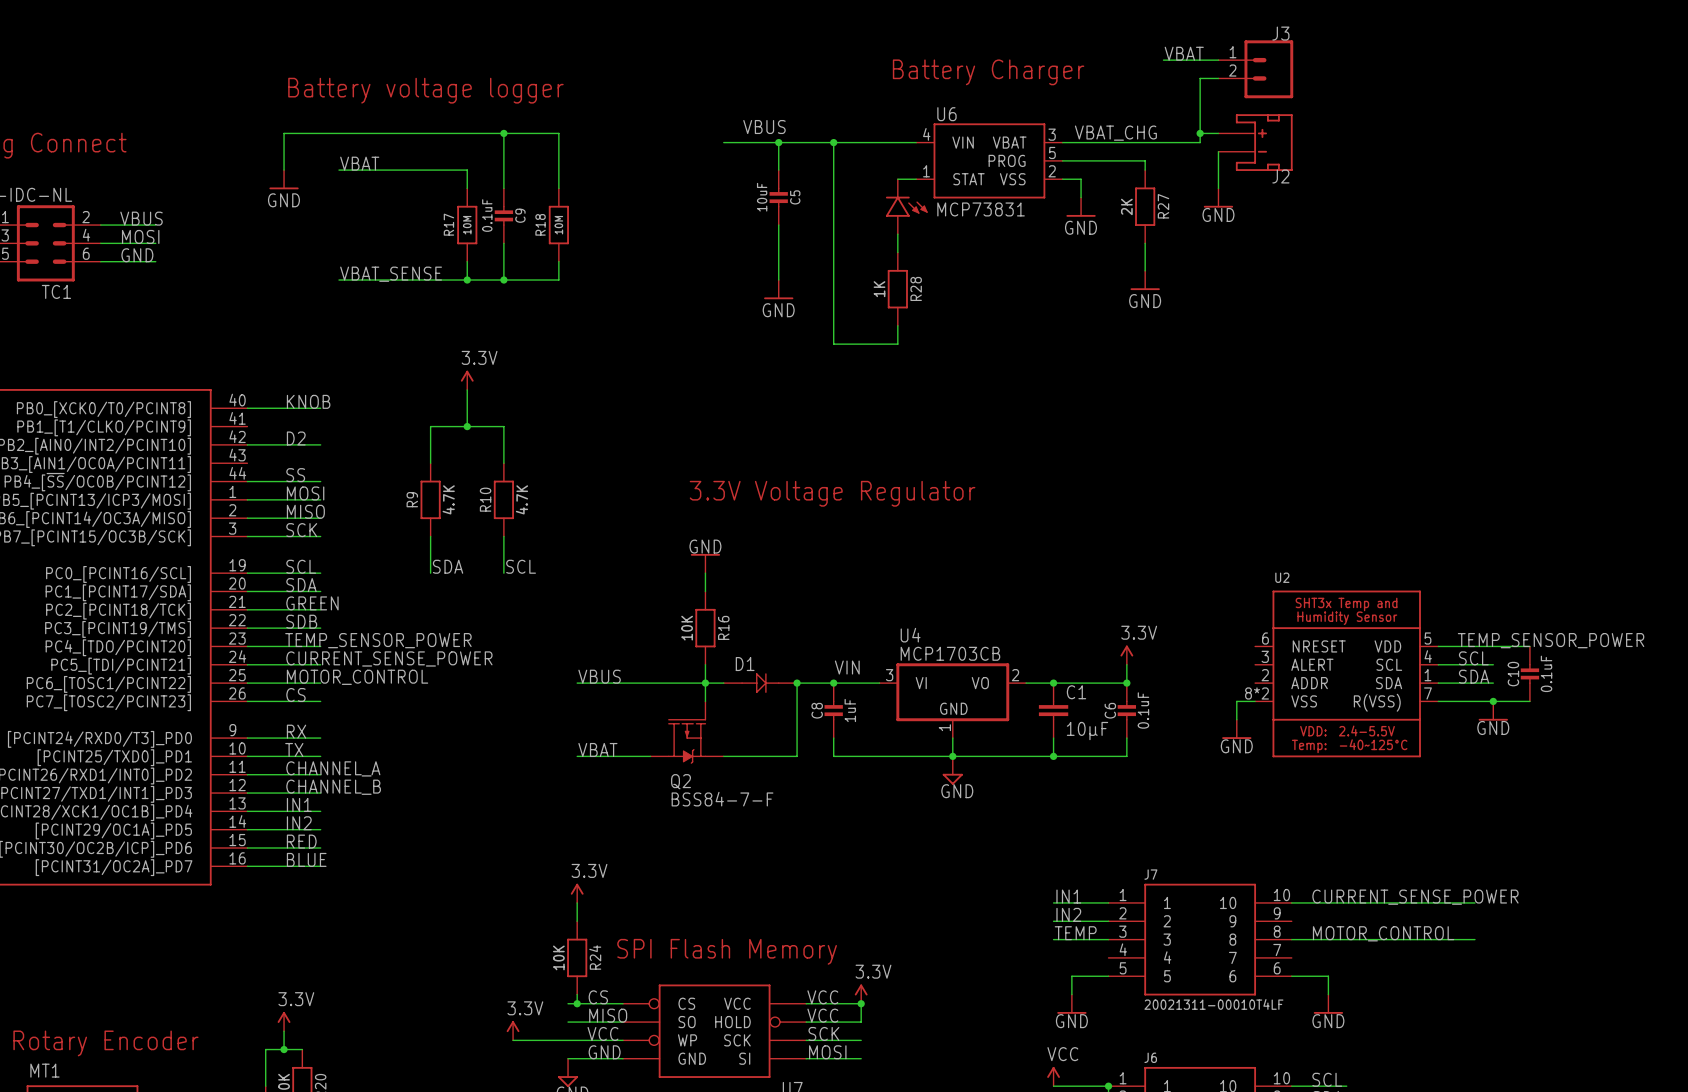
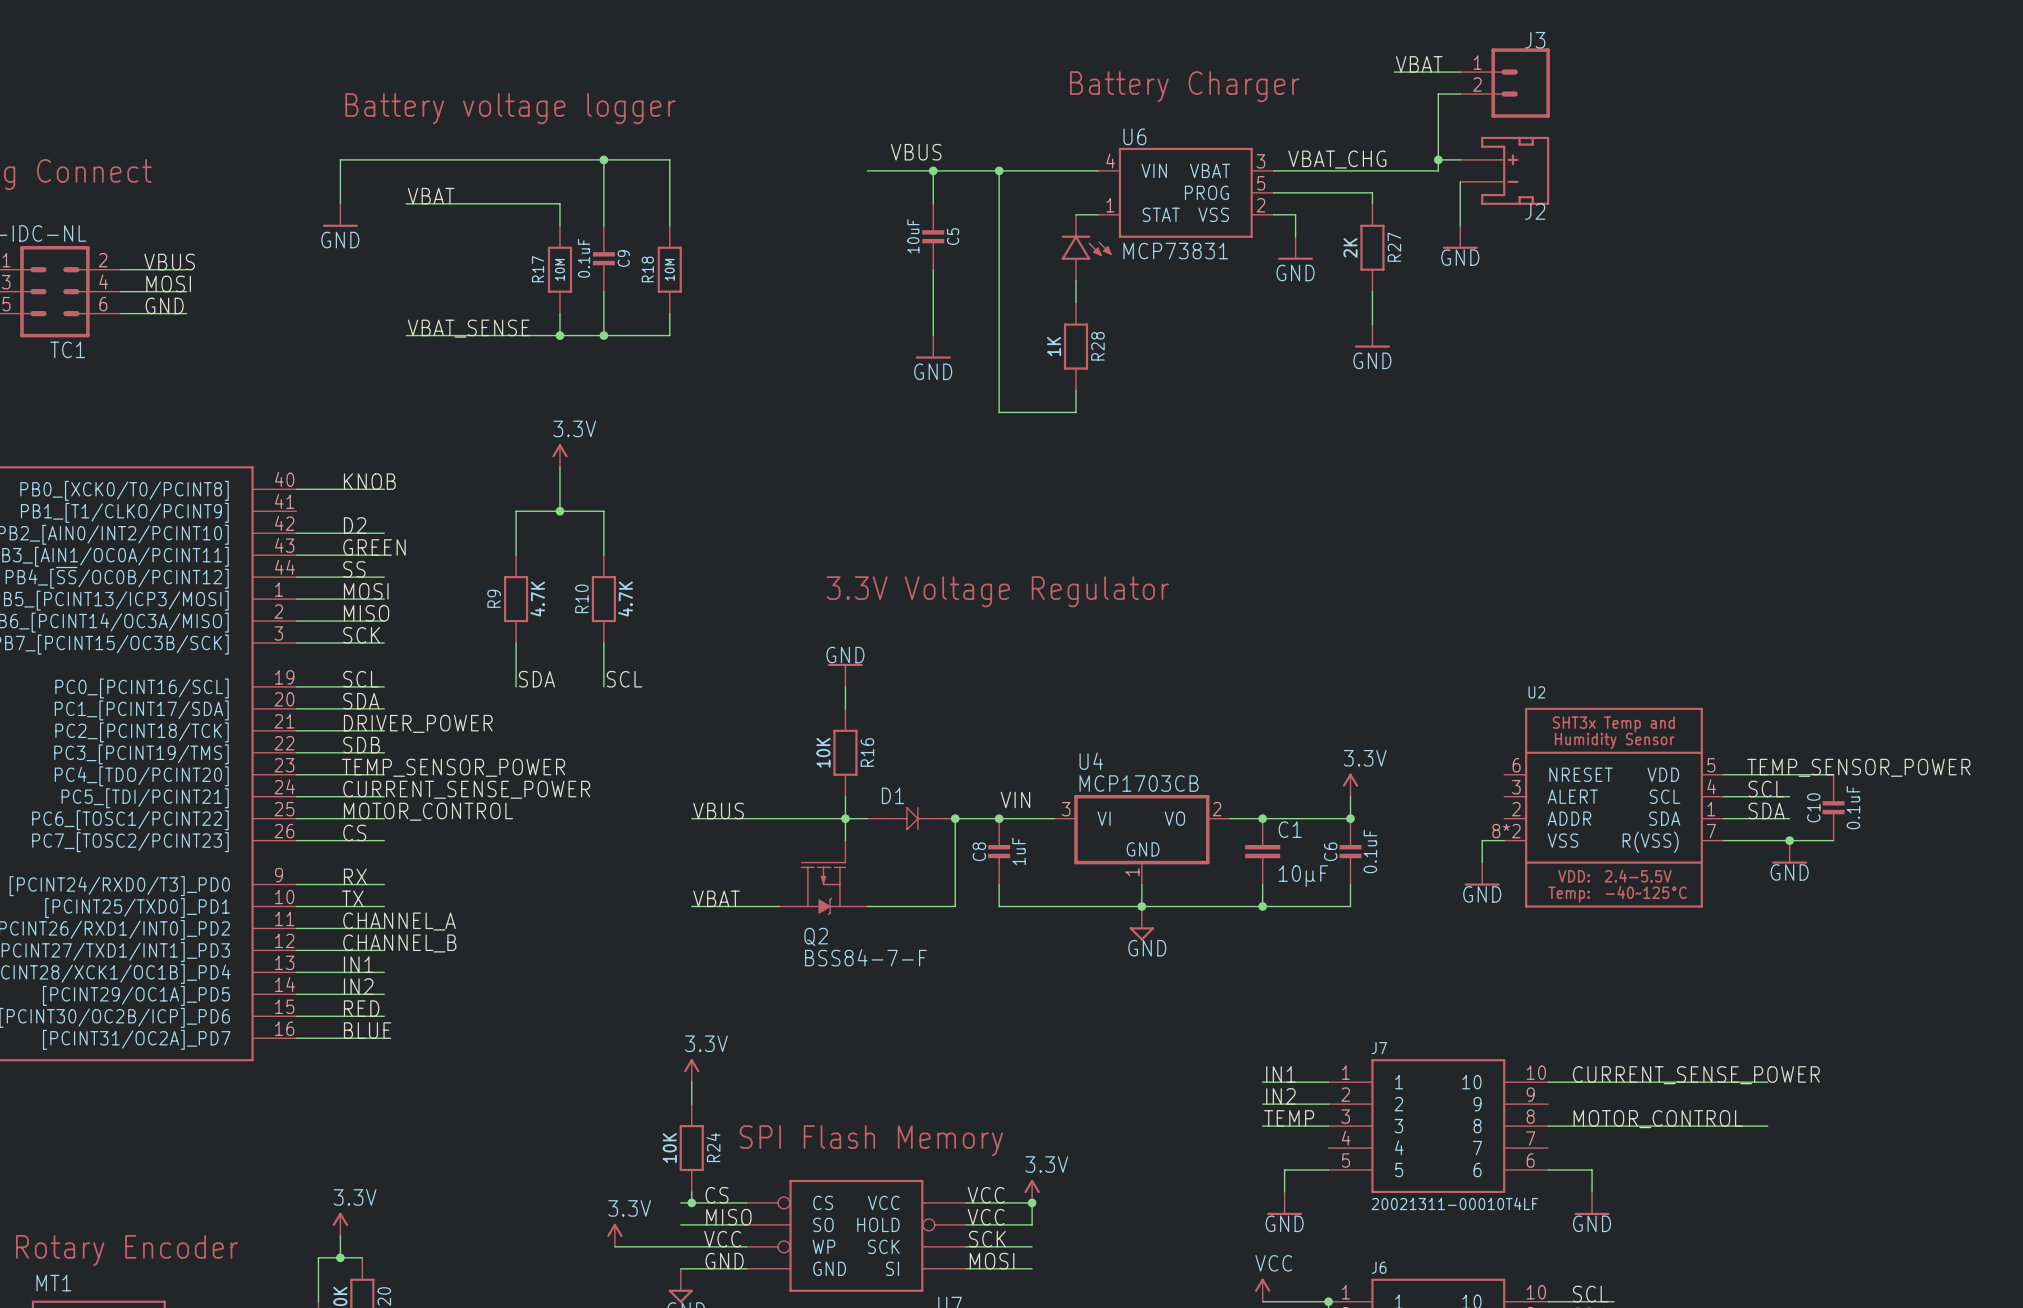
label: none -> GREEN (374, 547)
wire: none -> (296, 555) (384, 555)
label: GREEN (312, 603) -> DRIVER_POWER (418, 723)

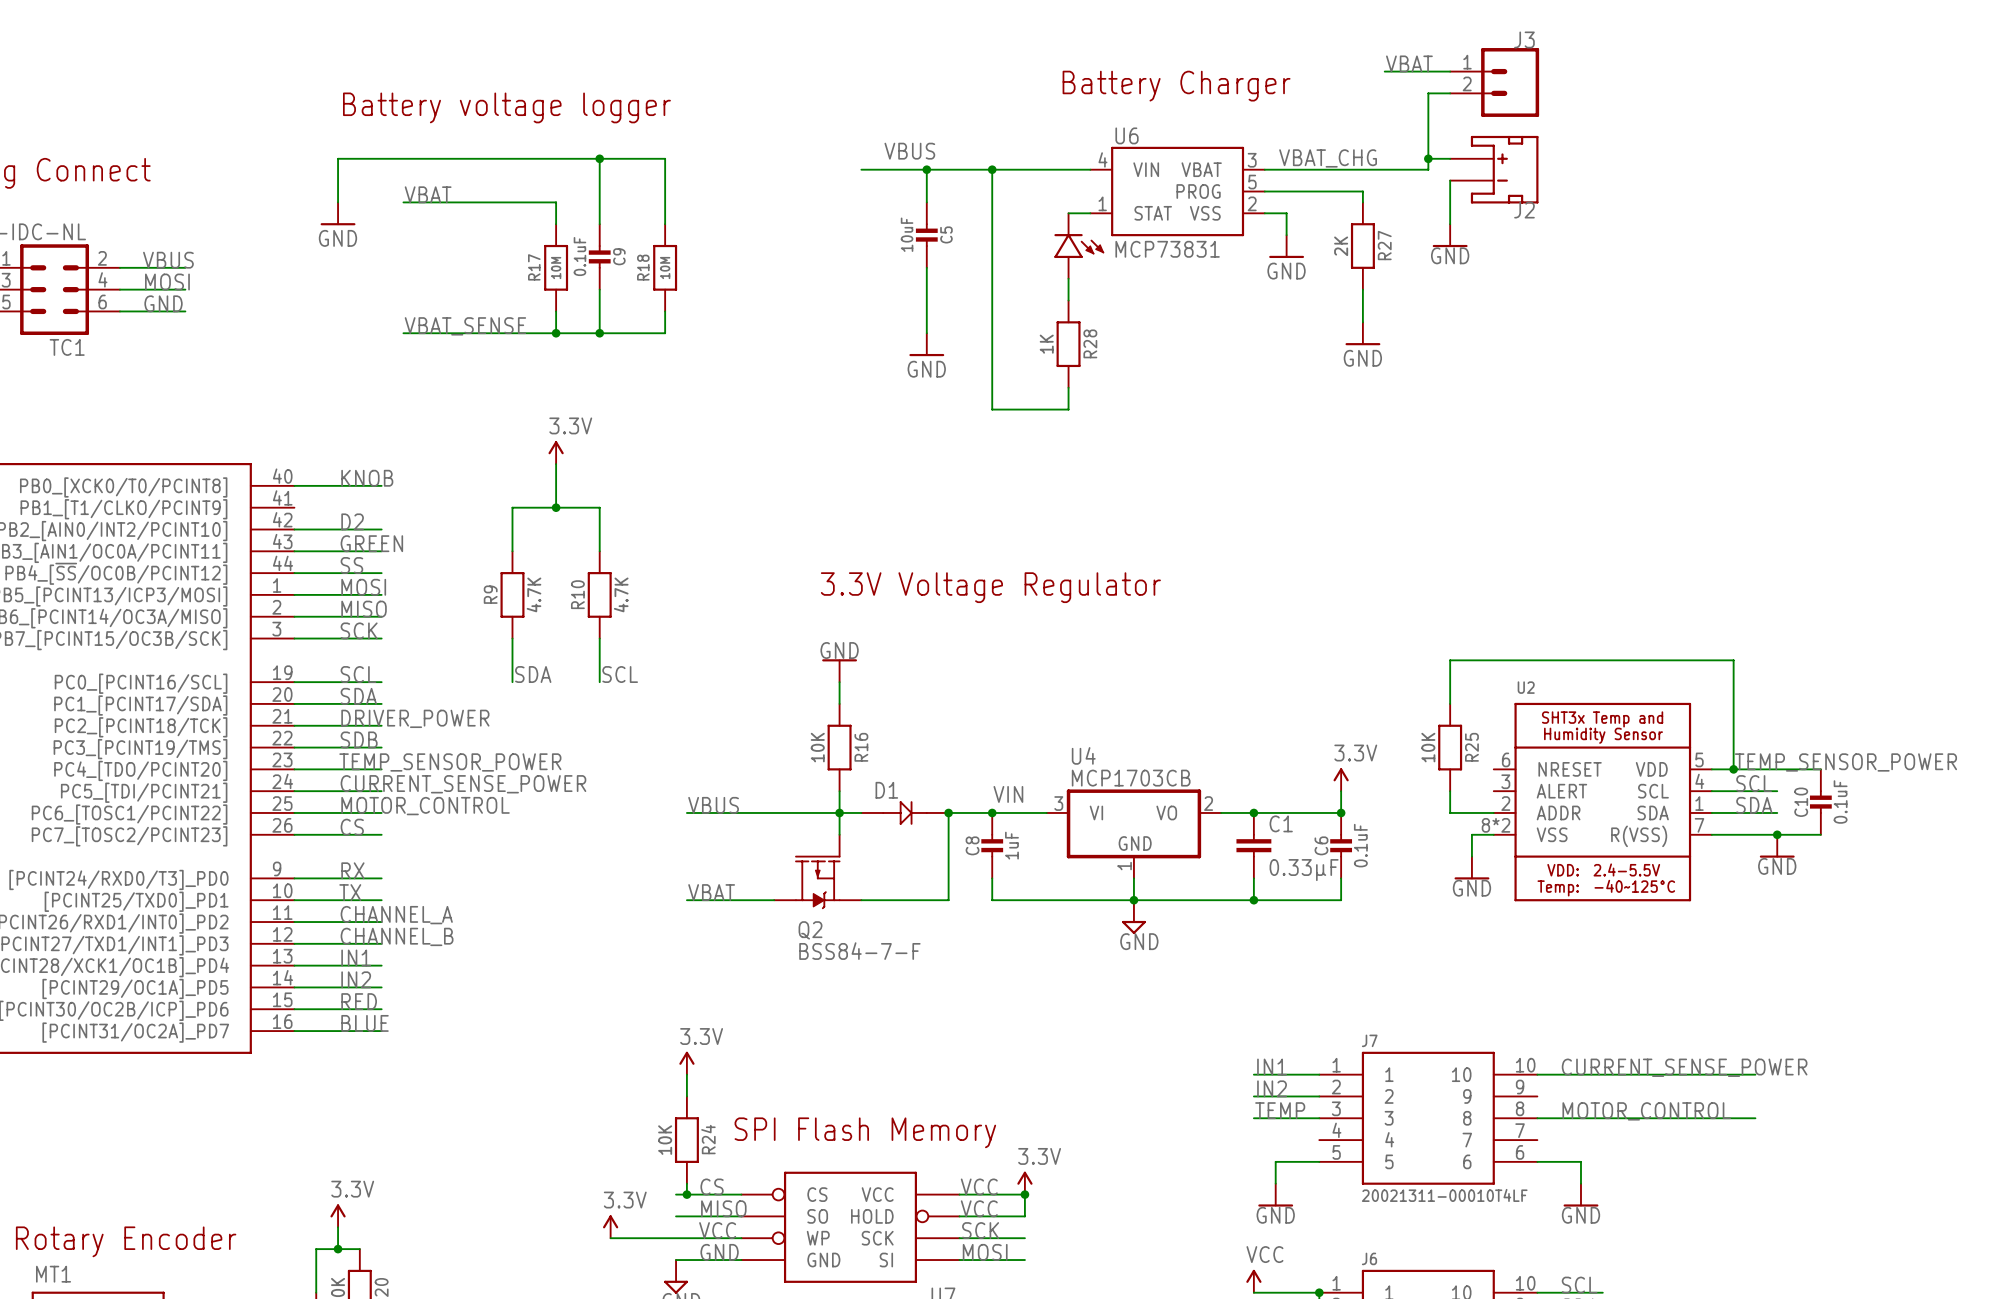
wire: none -> (1450, 703) (1450, 660) (1733, 660) (1733, 769)
R25: none -> 10K (1450, 747)
junction: none -> (1733, 769)
wire: none -> (1450, 791) (1450, 812) (1493, 812)
C1 value: 10µF (1303, 876) -> 0.33µF (1304, 870)

